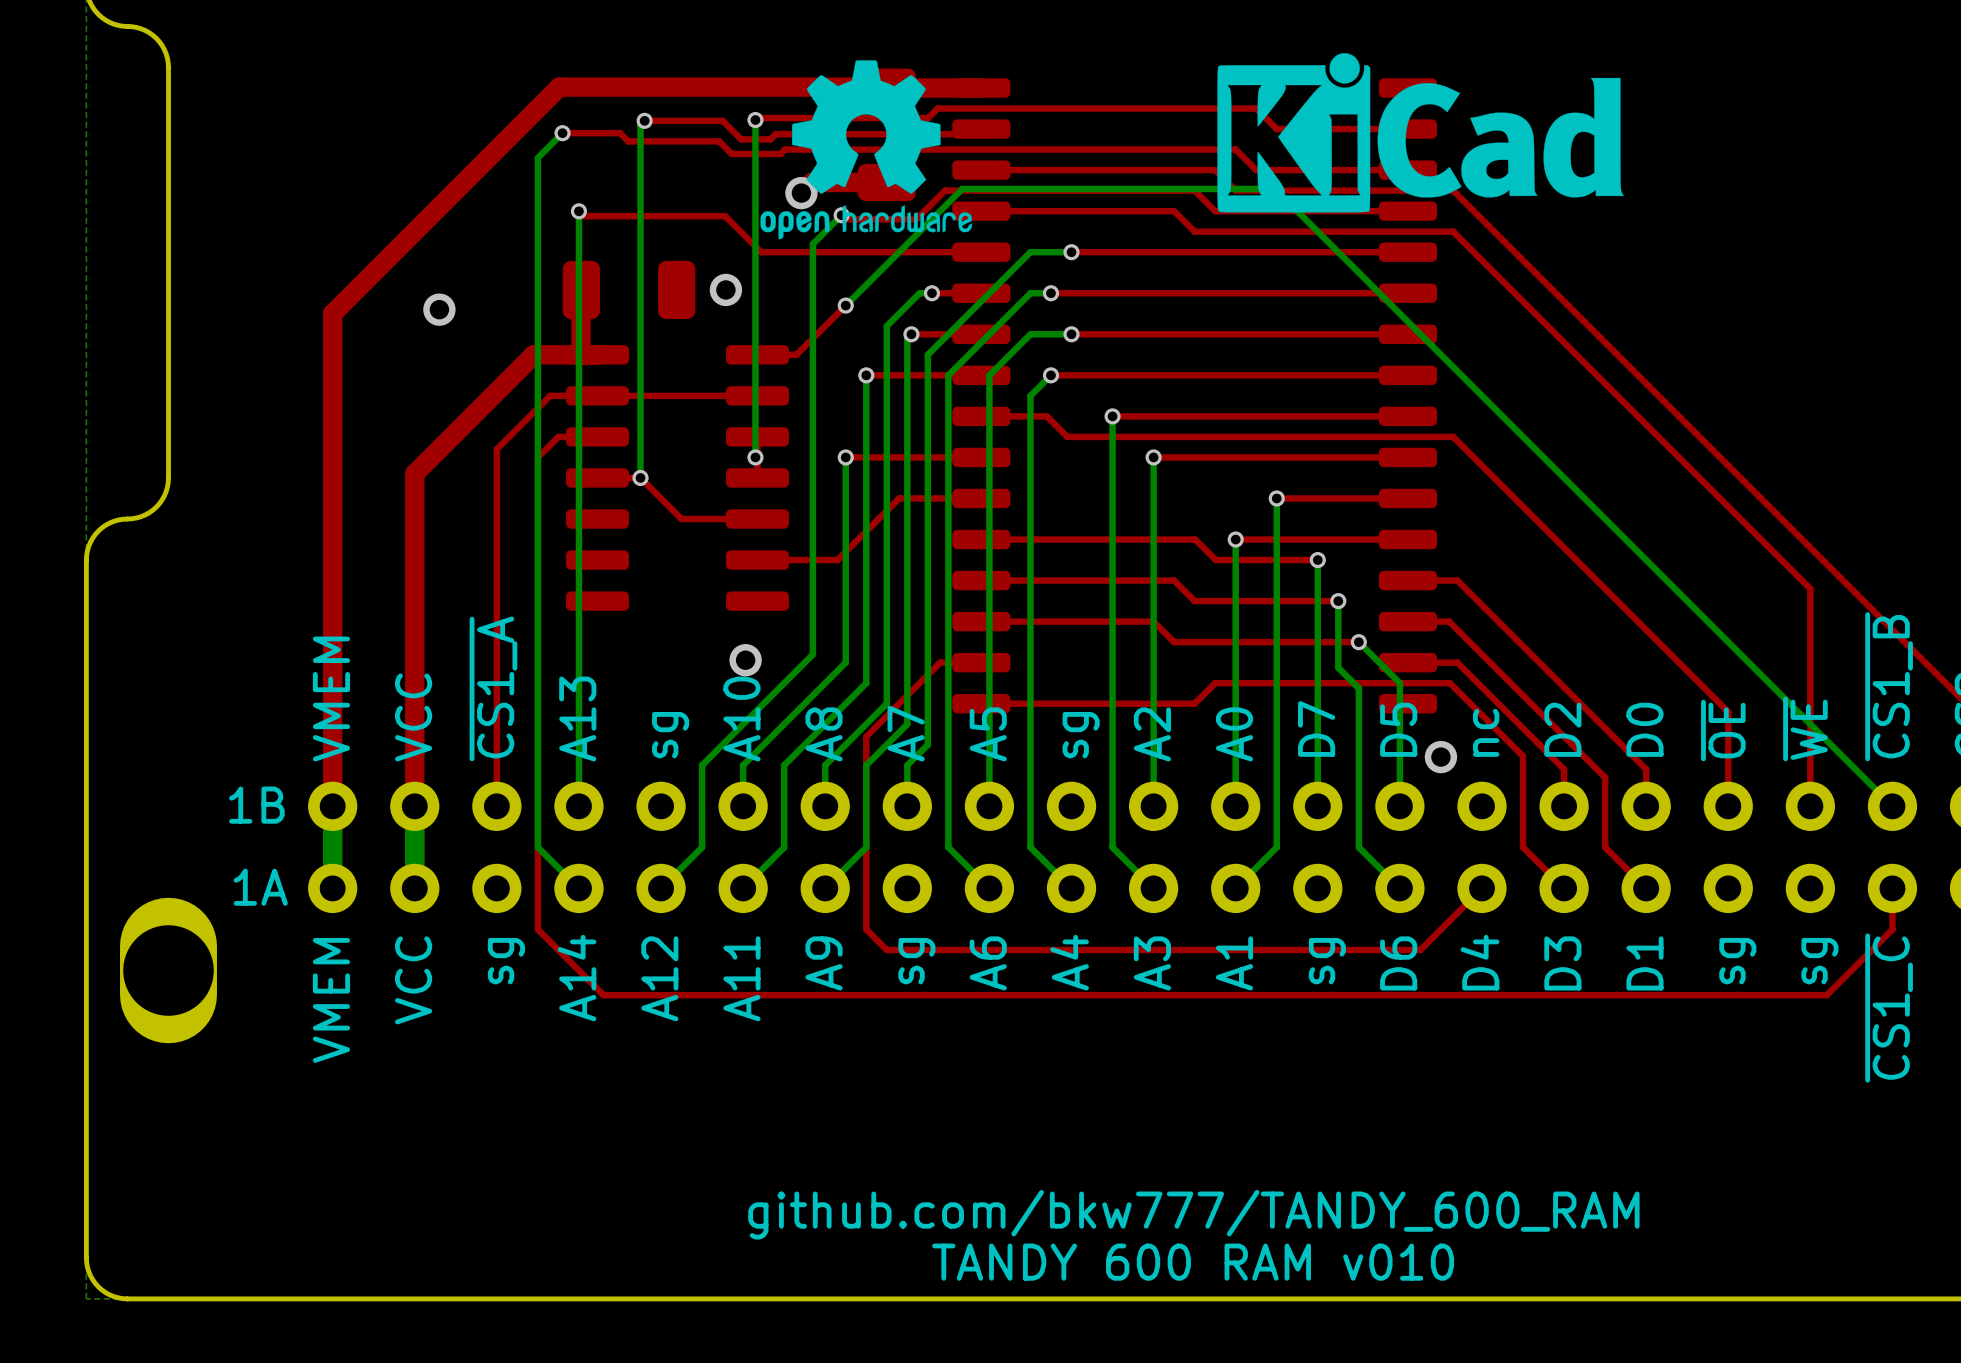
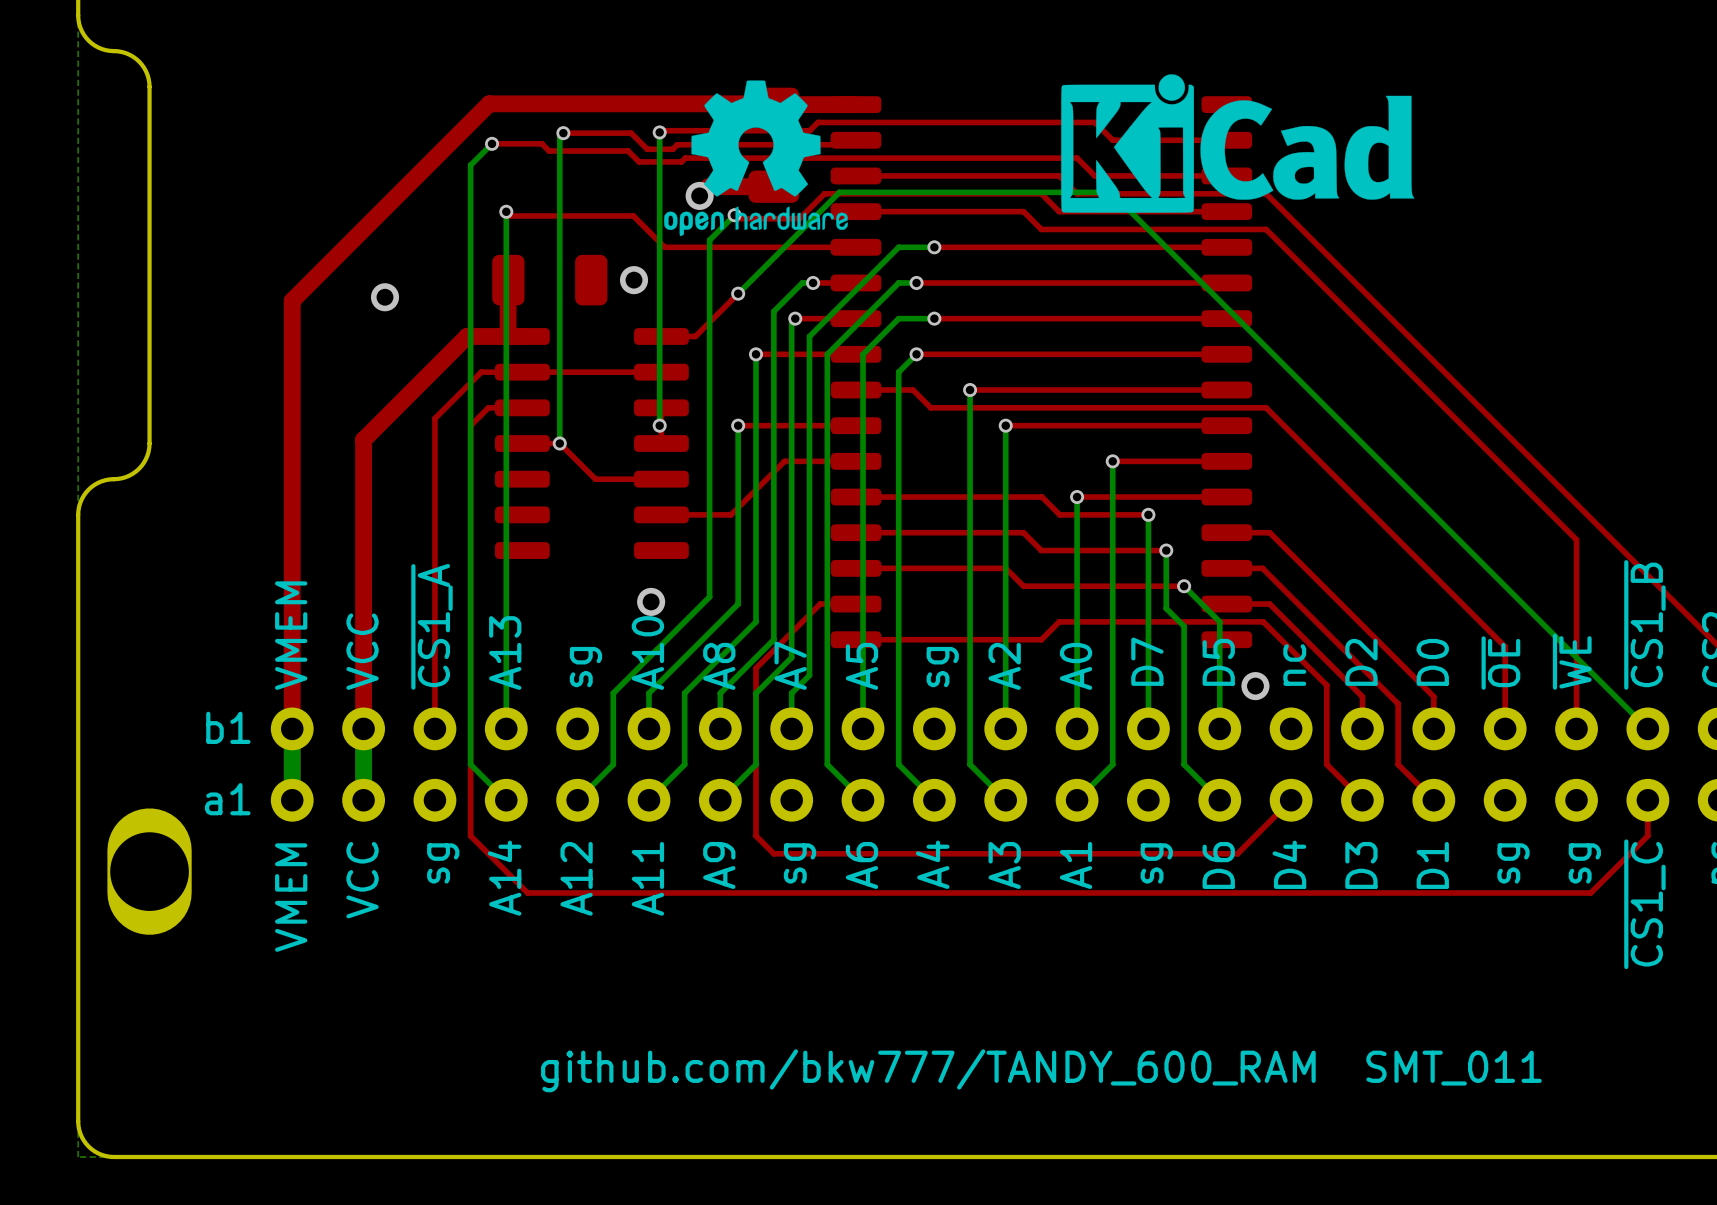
text: 1B (256, 805) -> b1 (228, 727)
text: 1A (260, 887) -> a1 (227, 799)
text: github.com/bkw777/TANDY_600_RAM (1193, 1214) -> github.com/bkw777/TANDY_600_RAM SMT_011 (1041, 1070)
text: TANDY 600 RAM v010 (1193, 1262) -> none

